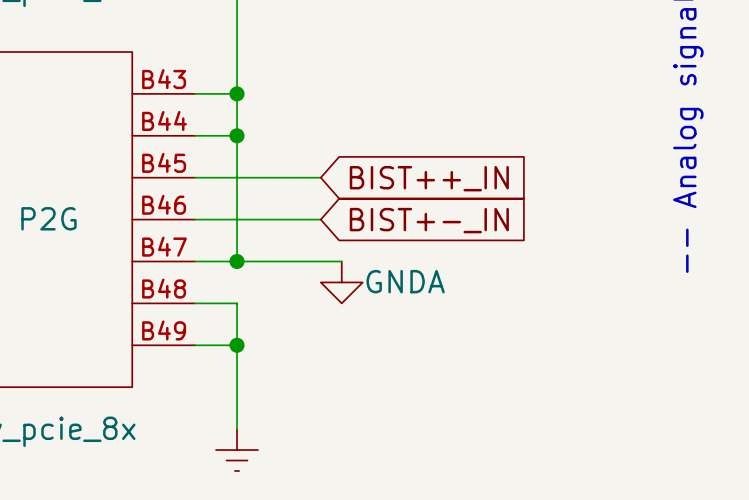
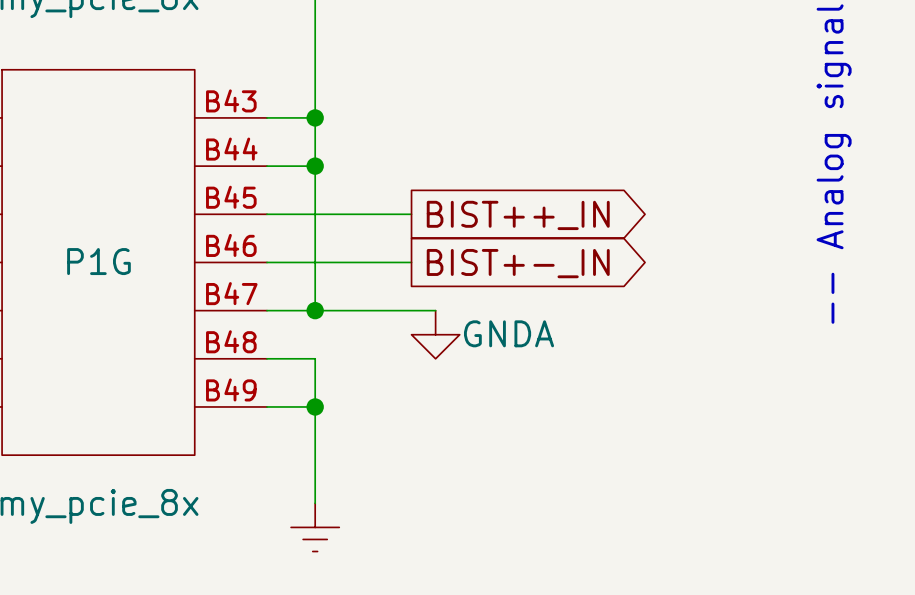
global label shape: input (429, 178) -> output (518, 215)
P2G name: P2G (48, 218) -> P1G (98, 261)
global label shape: input (429, 220) -> output (518, 263)

